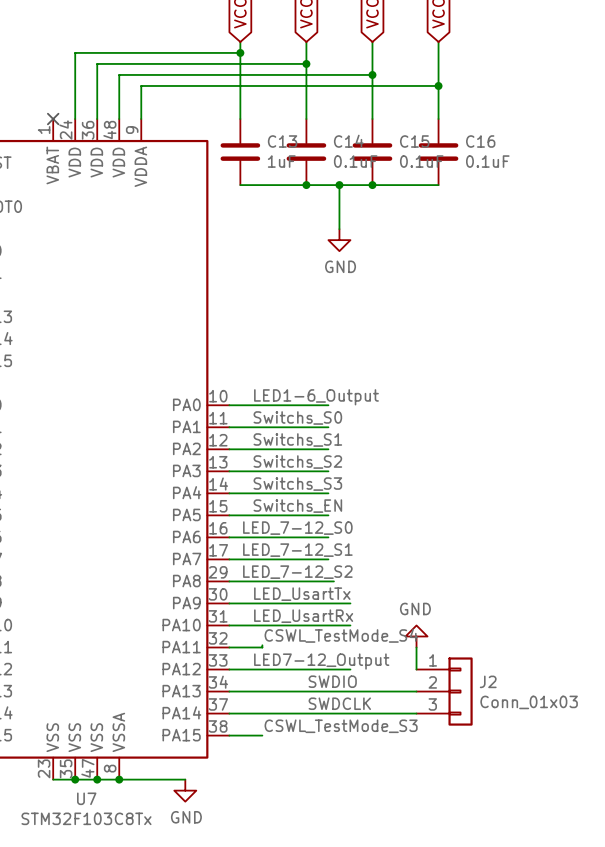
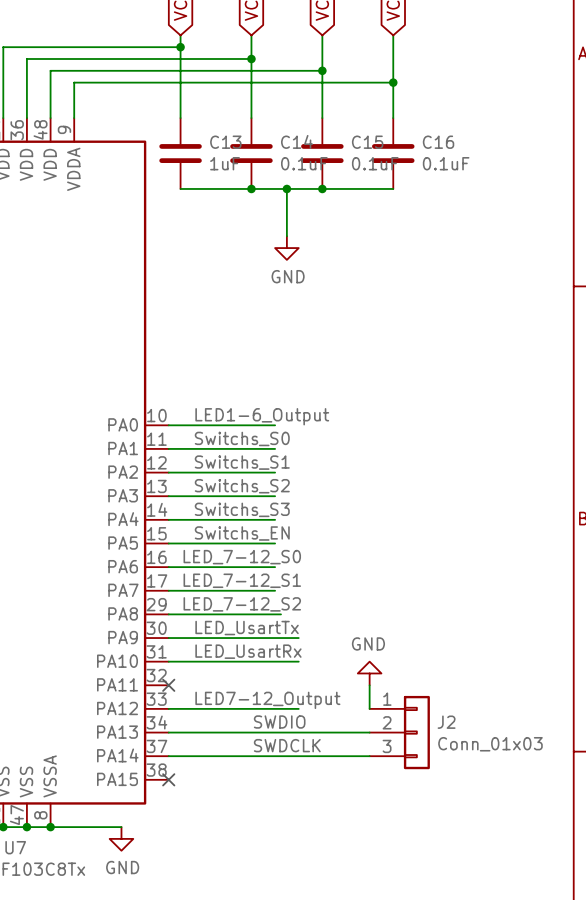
label: CSWL_TestMode_S4 (341, 635) -> none
wire: (262, 645) (262, 647) (229, 647) -> none
no-connect mark: none -> (168, 685)
label: CSWL_TestMode_S3 (341, 726) -> none
wire: (229, 735) (262, 735) -> none
no-connect mark: none -> (168, 779)

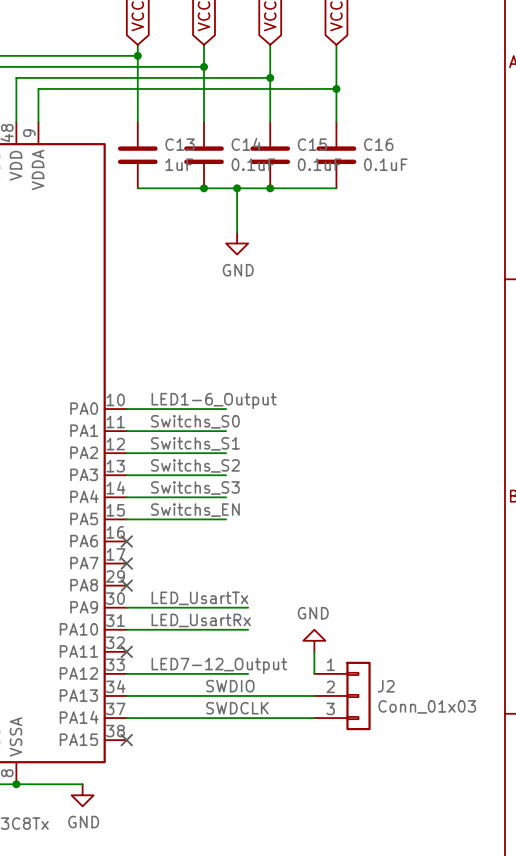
label: LED_7-12_S0 (242, 557) -> none
wire: (168, 567) (275, 567) -> none
no-connect mark: none -> (126, 541)
label: LED_7-12_S1 (242, 580) -> none
wire: (168, 590) (275, 590) -> none
no-connect mark: none -> (126, 563)
label: LED_7-12_S2 (242, 604) -> none
wire: (168, 614) (281, 614) -> none
no-connect mark: none -> (126, 585)

